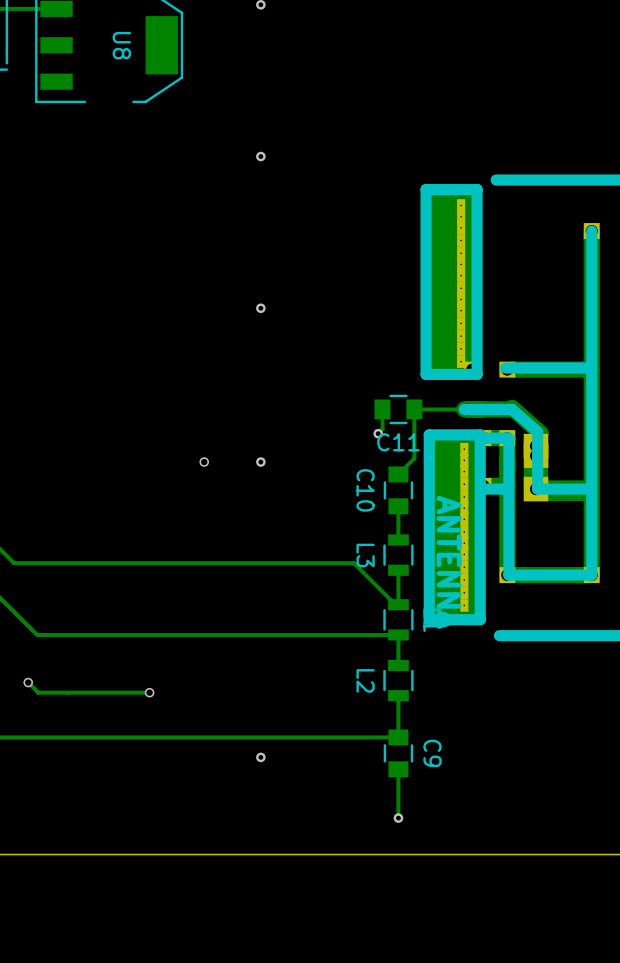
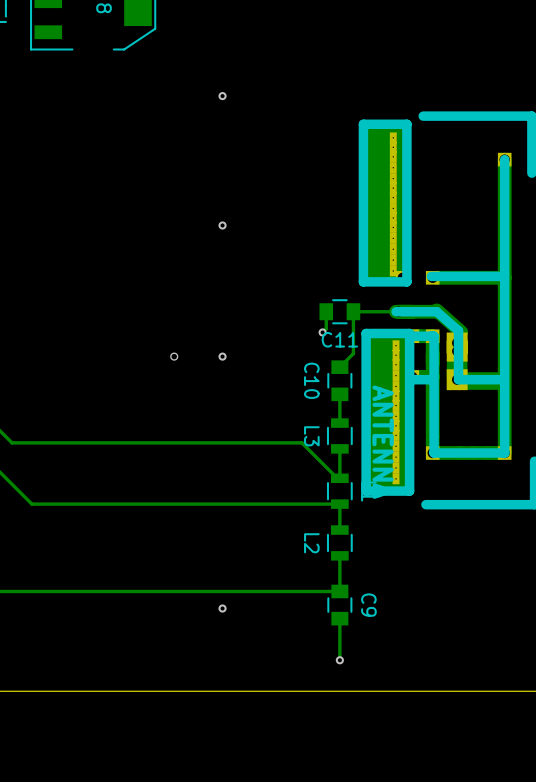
track: (28, 682) (38, 692) (149, 692) -> none
via: (28, 682) -> none
via: (149, 692) -> none

